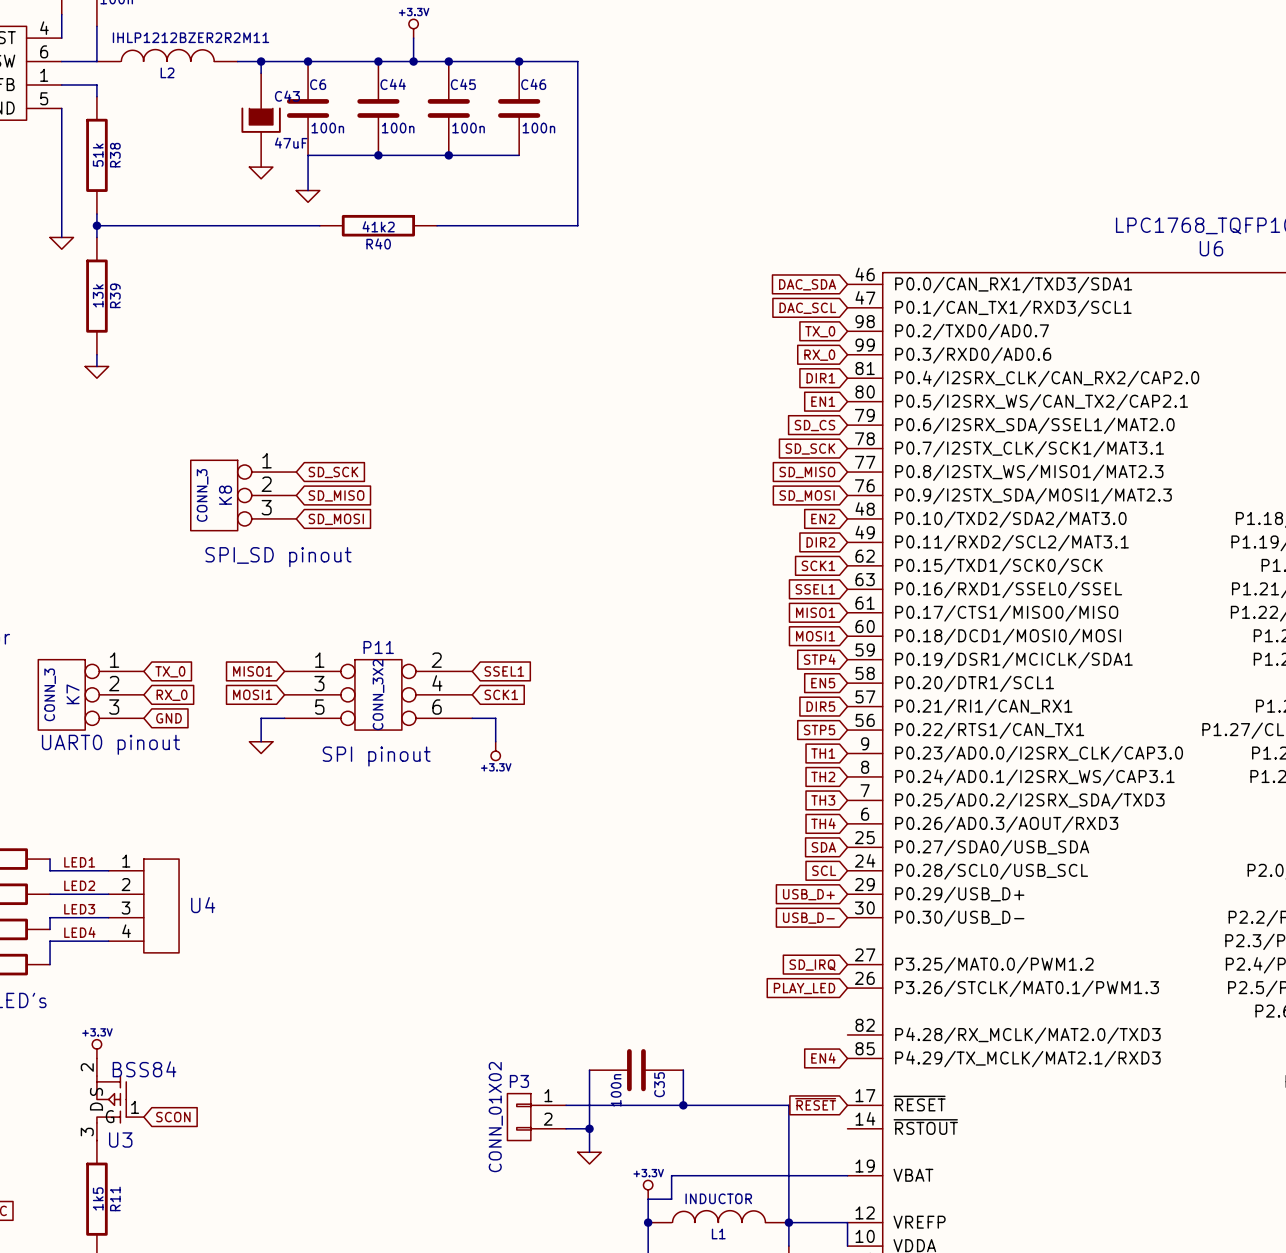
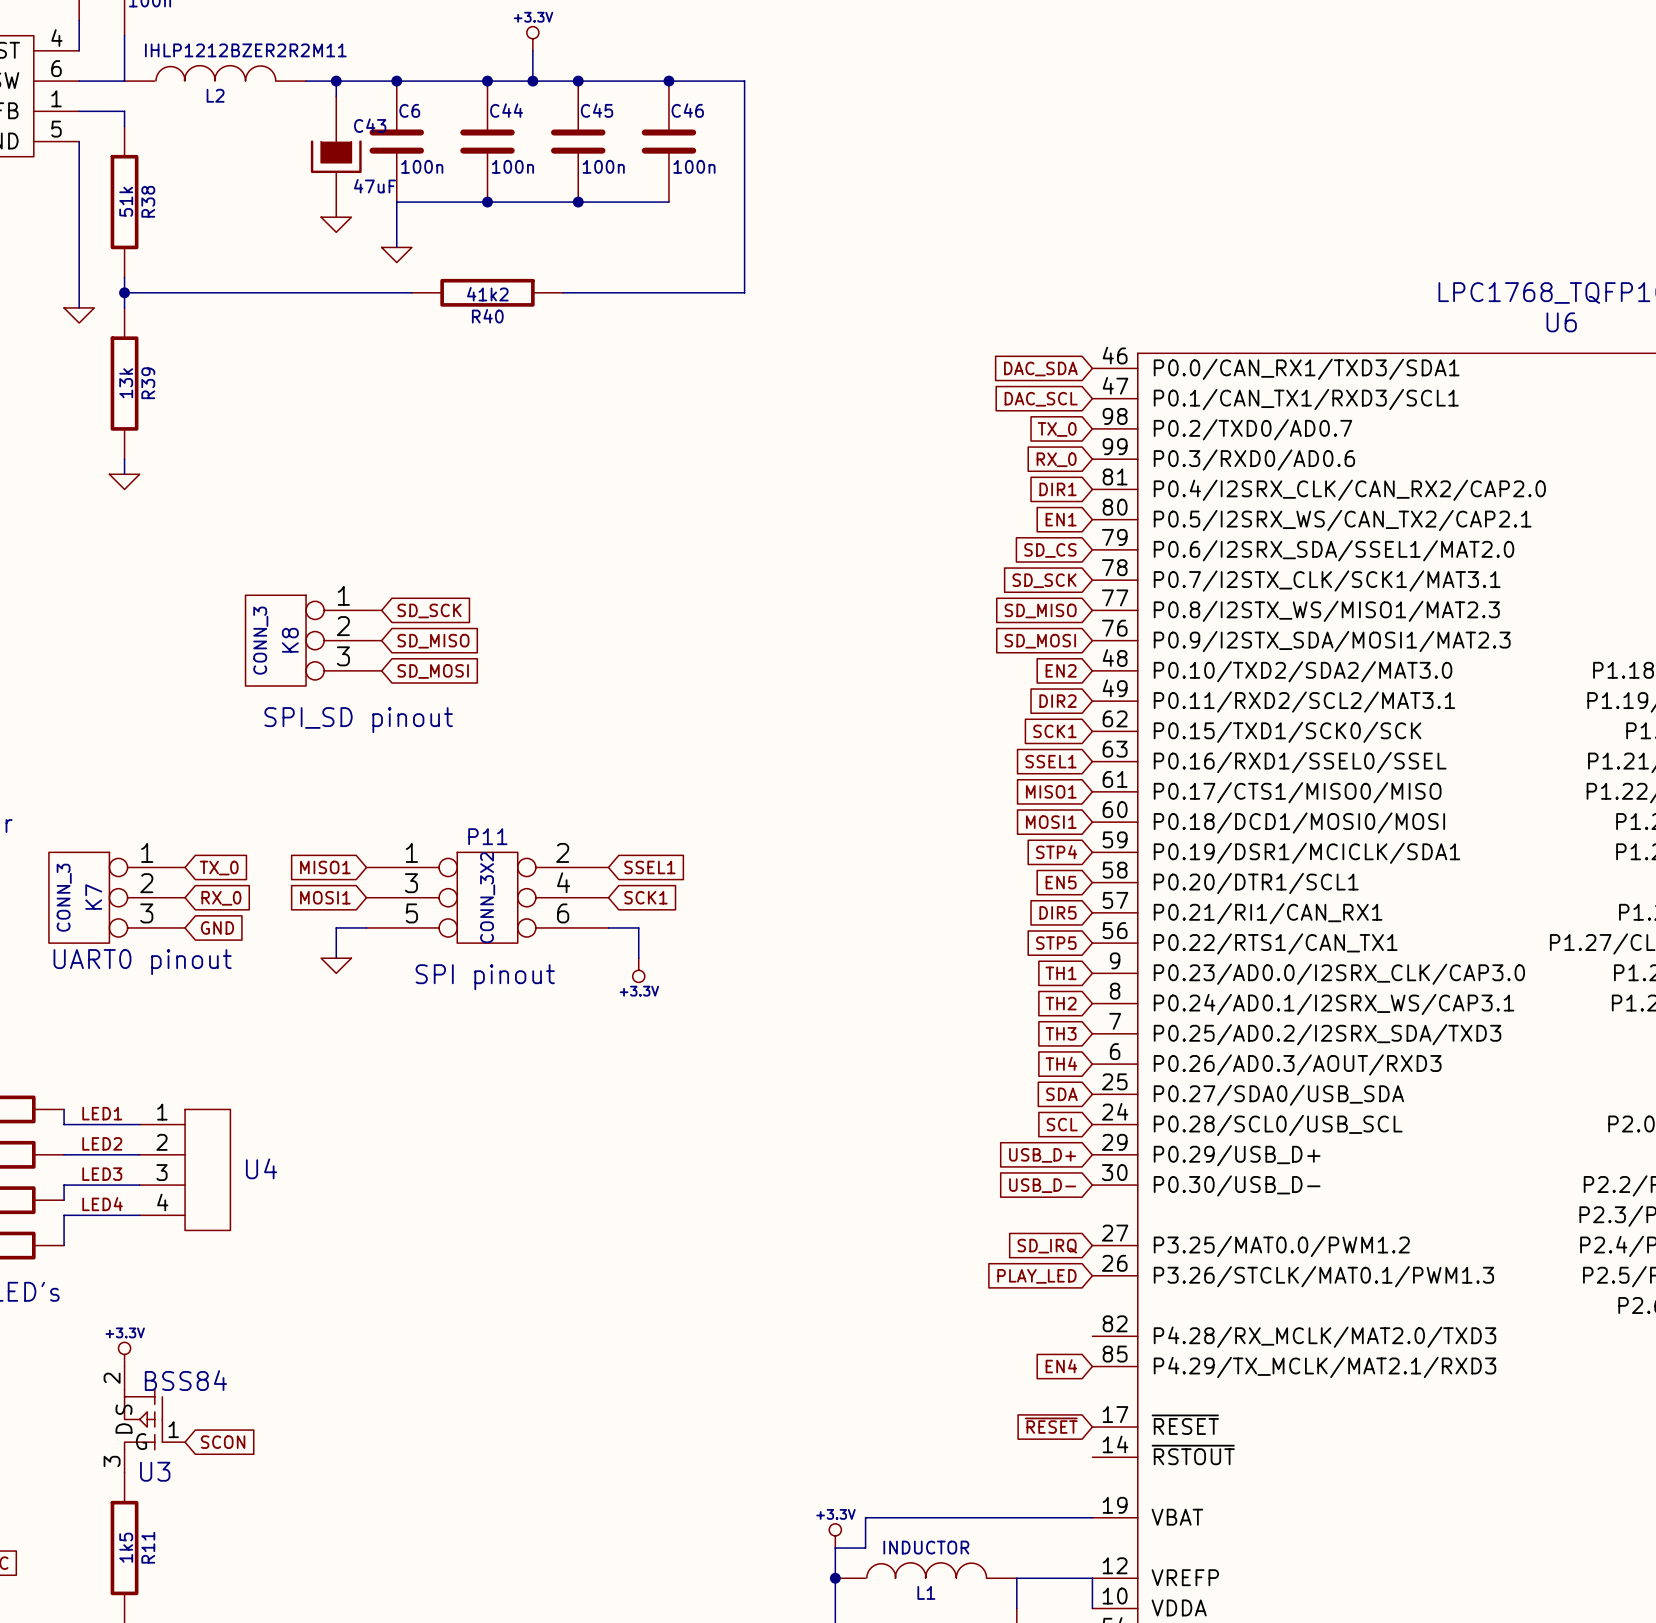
wire: (589, 1070) (589, 1152) -> none
C35: 100n (636, 1070) -> none
wire: (683, 1070) (683, 1105) -> none
wire: (566, 1105) (788, 1105) (788, 1222) -> none
junction: (683, 1105) -> none
P3: CONN_01X02 (536, 1117) -> none
wire: (566, 1128) (589, 1128) -> none
junction: (589, 1128) -> none
power symbol: (589, 1158) -> none
junction: (788, 1222) -> none

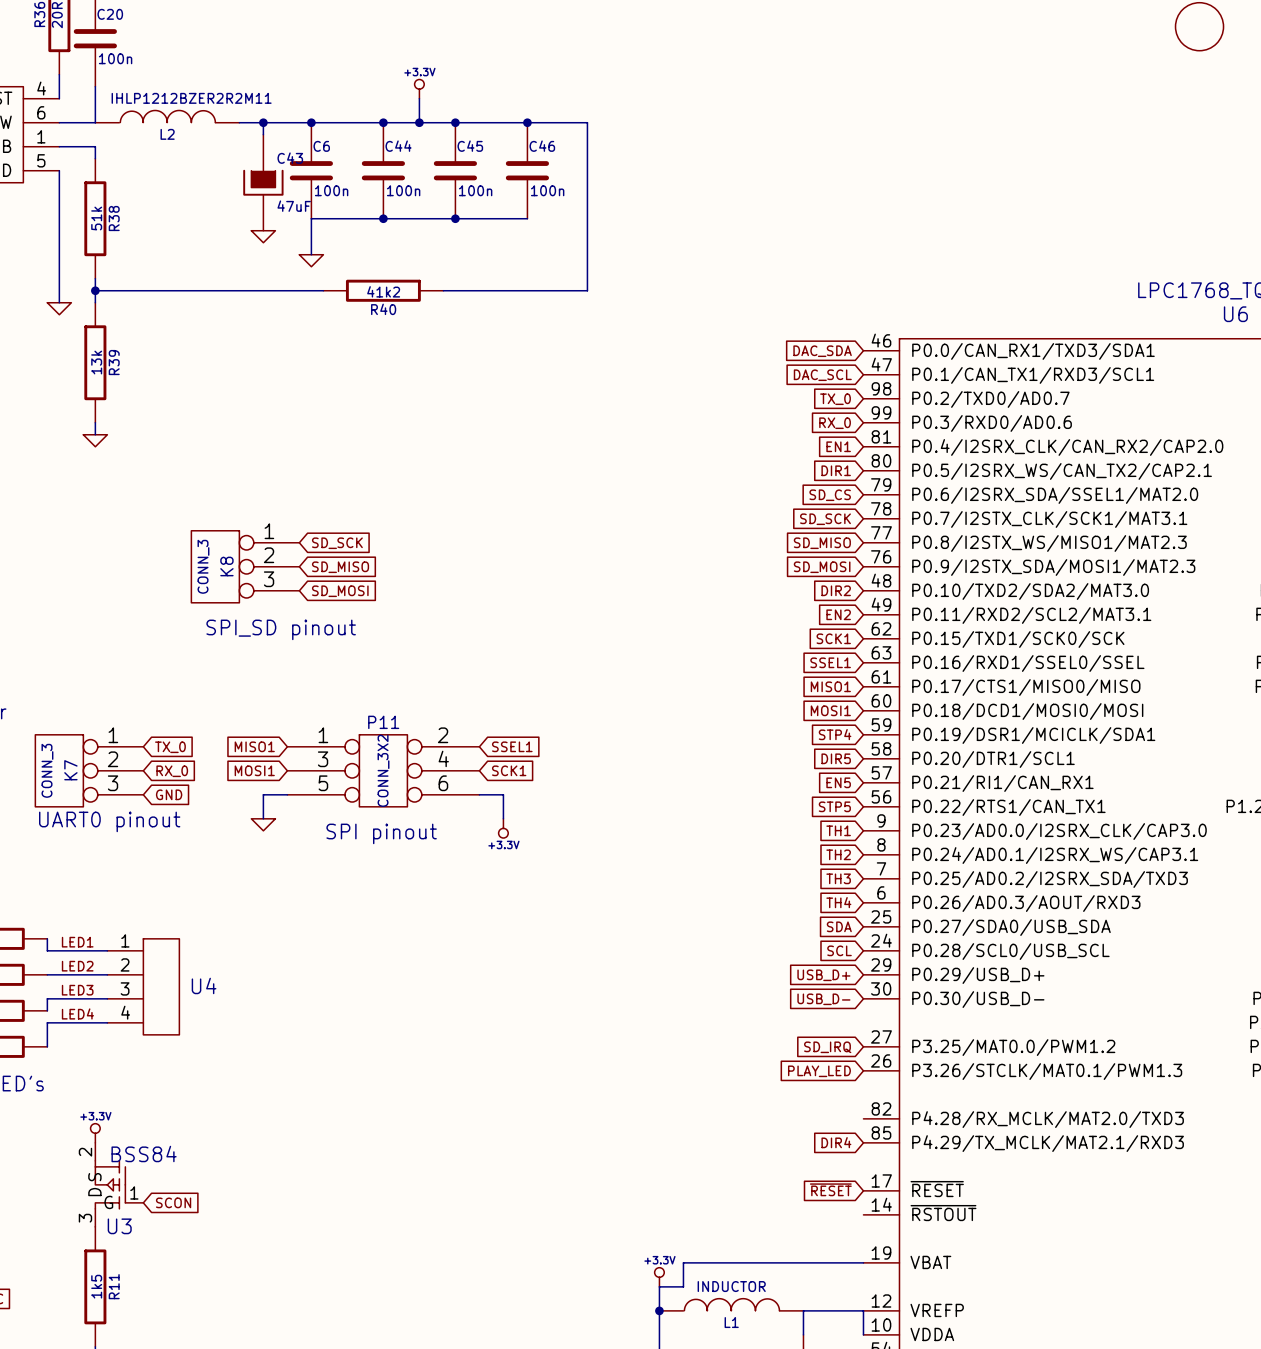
global label: DIR1 (1058, 489) -> EN1 (838, 446)
global label: EN1 (1061, 519) -> DIR1 (836, 470)
global label: EN2 (1061, 670) -> DIR2 (836, 590)
global label: DIR2 (1058, 701) -> EN2 (838, 614)
global label: EN5 (1061, 882) -> DIR5 (836, 758)
global label: DIR5 (1058, 912) -> EN5 (838, 782)
global label: EN4 (1061, 1366) -> DIR4 (836, 1142)

